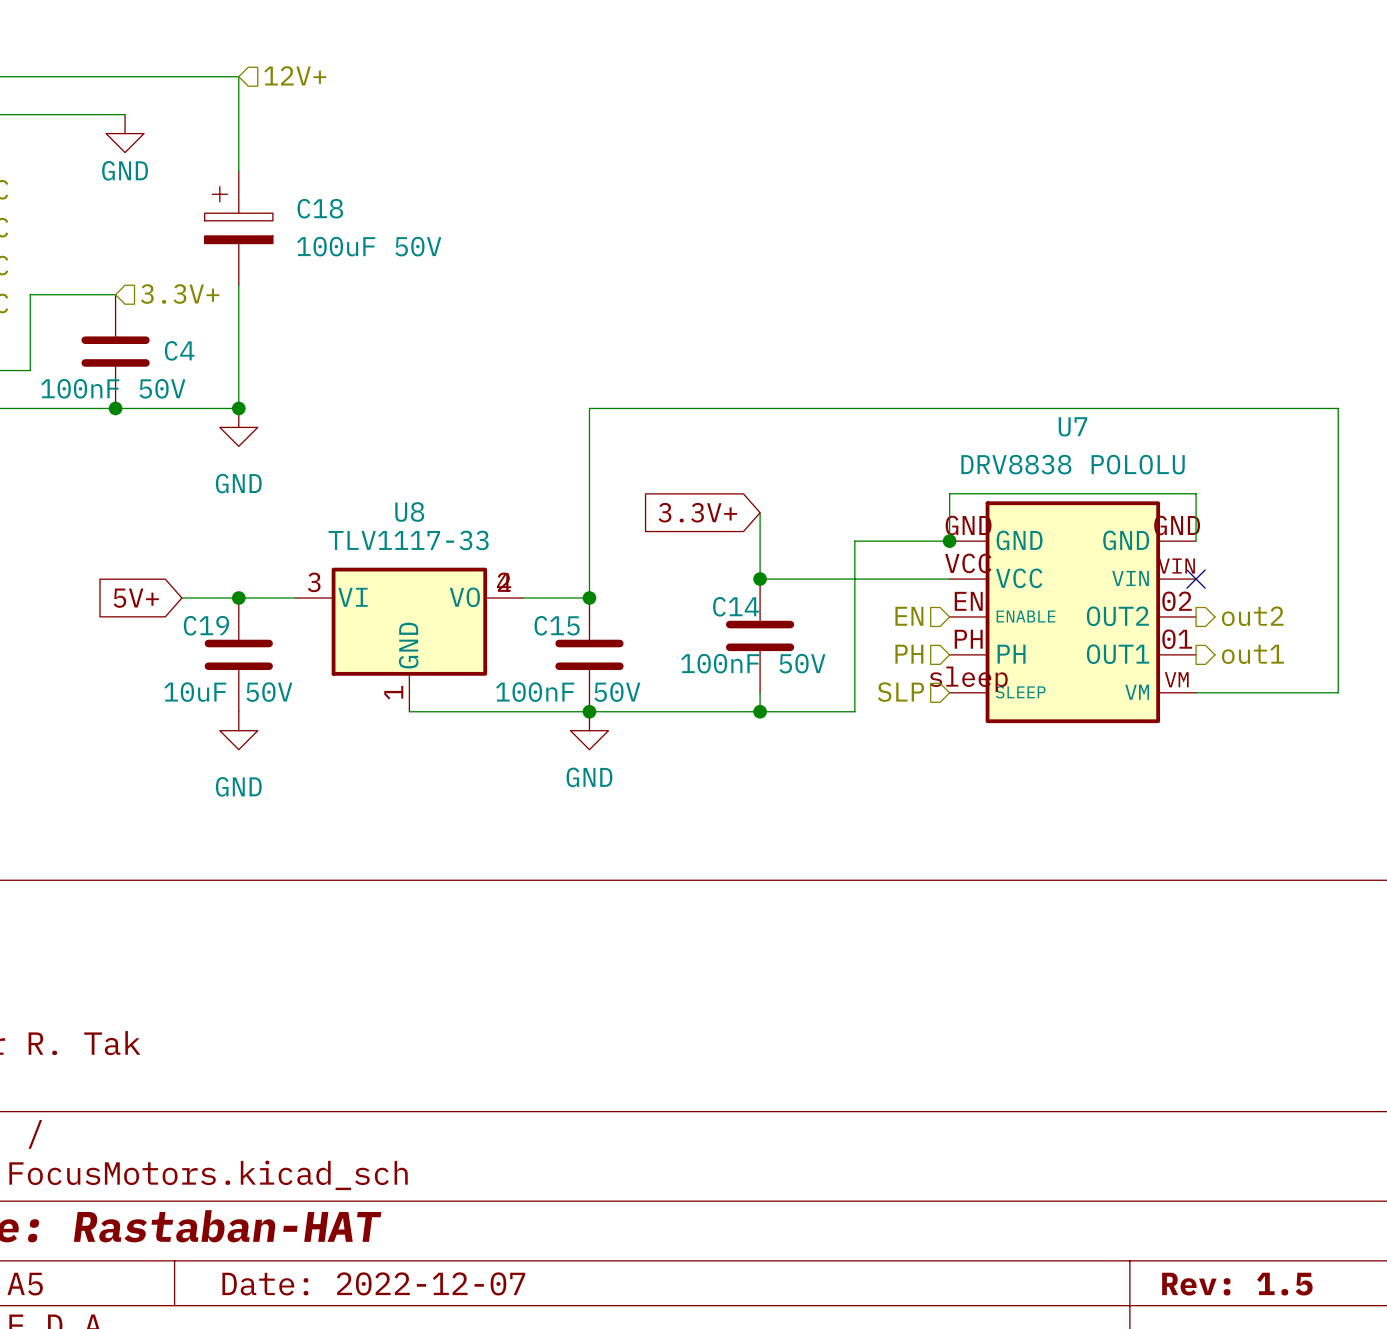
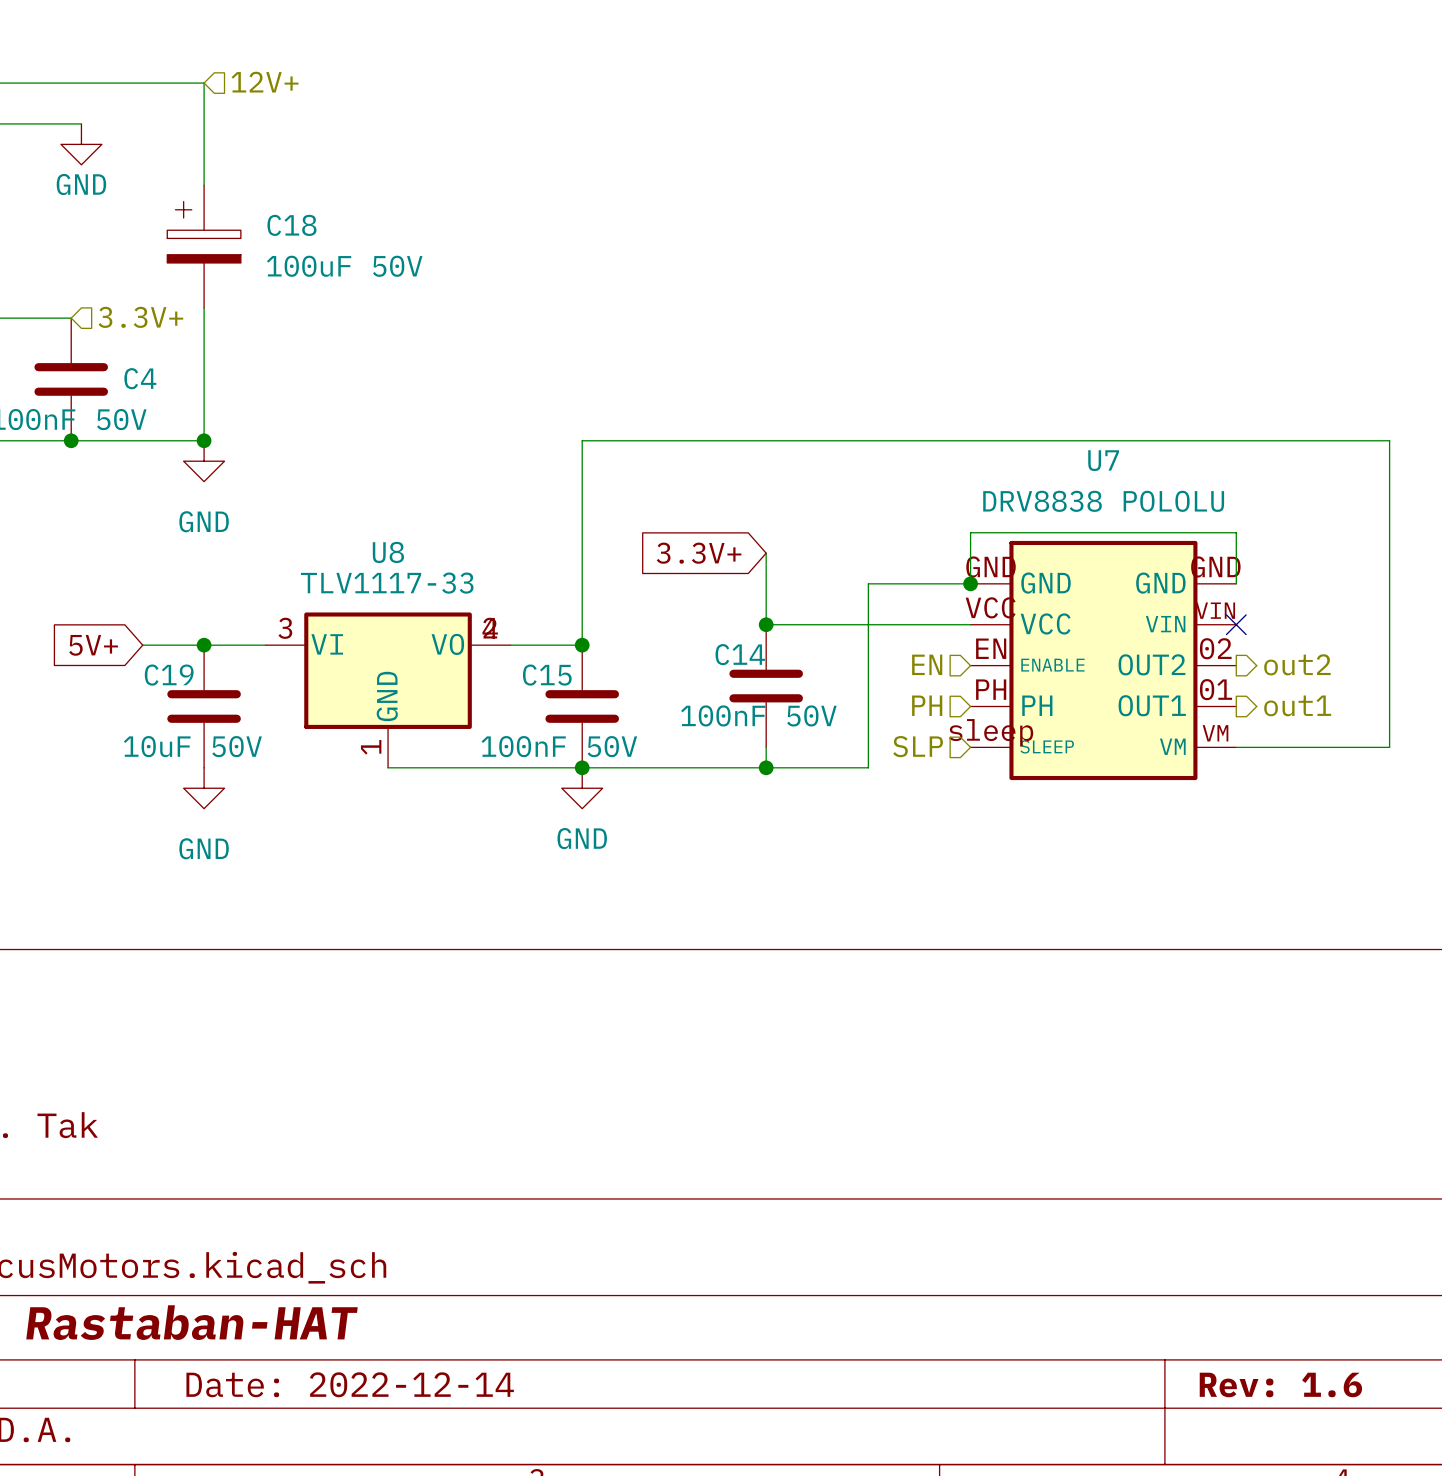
title block: Date: 2022-12-07 (373, 1283) -> Date: 2022-12-14 (350, 1384)
title block: Rev: 1.5 (1237, 1284) -> Rev: 1.6 (1280, 1384)

